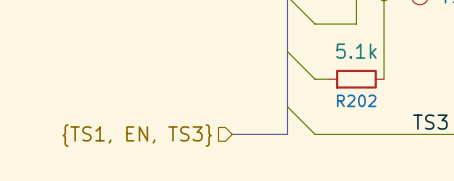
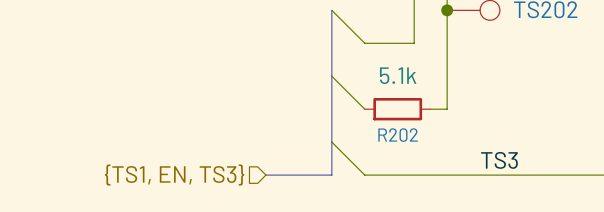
R202 position: (356, 79) -> (397, 109)

